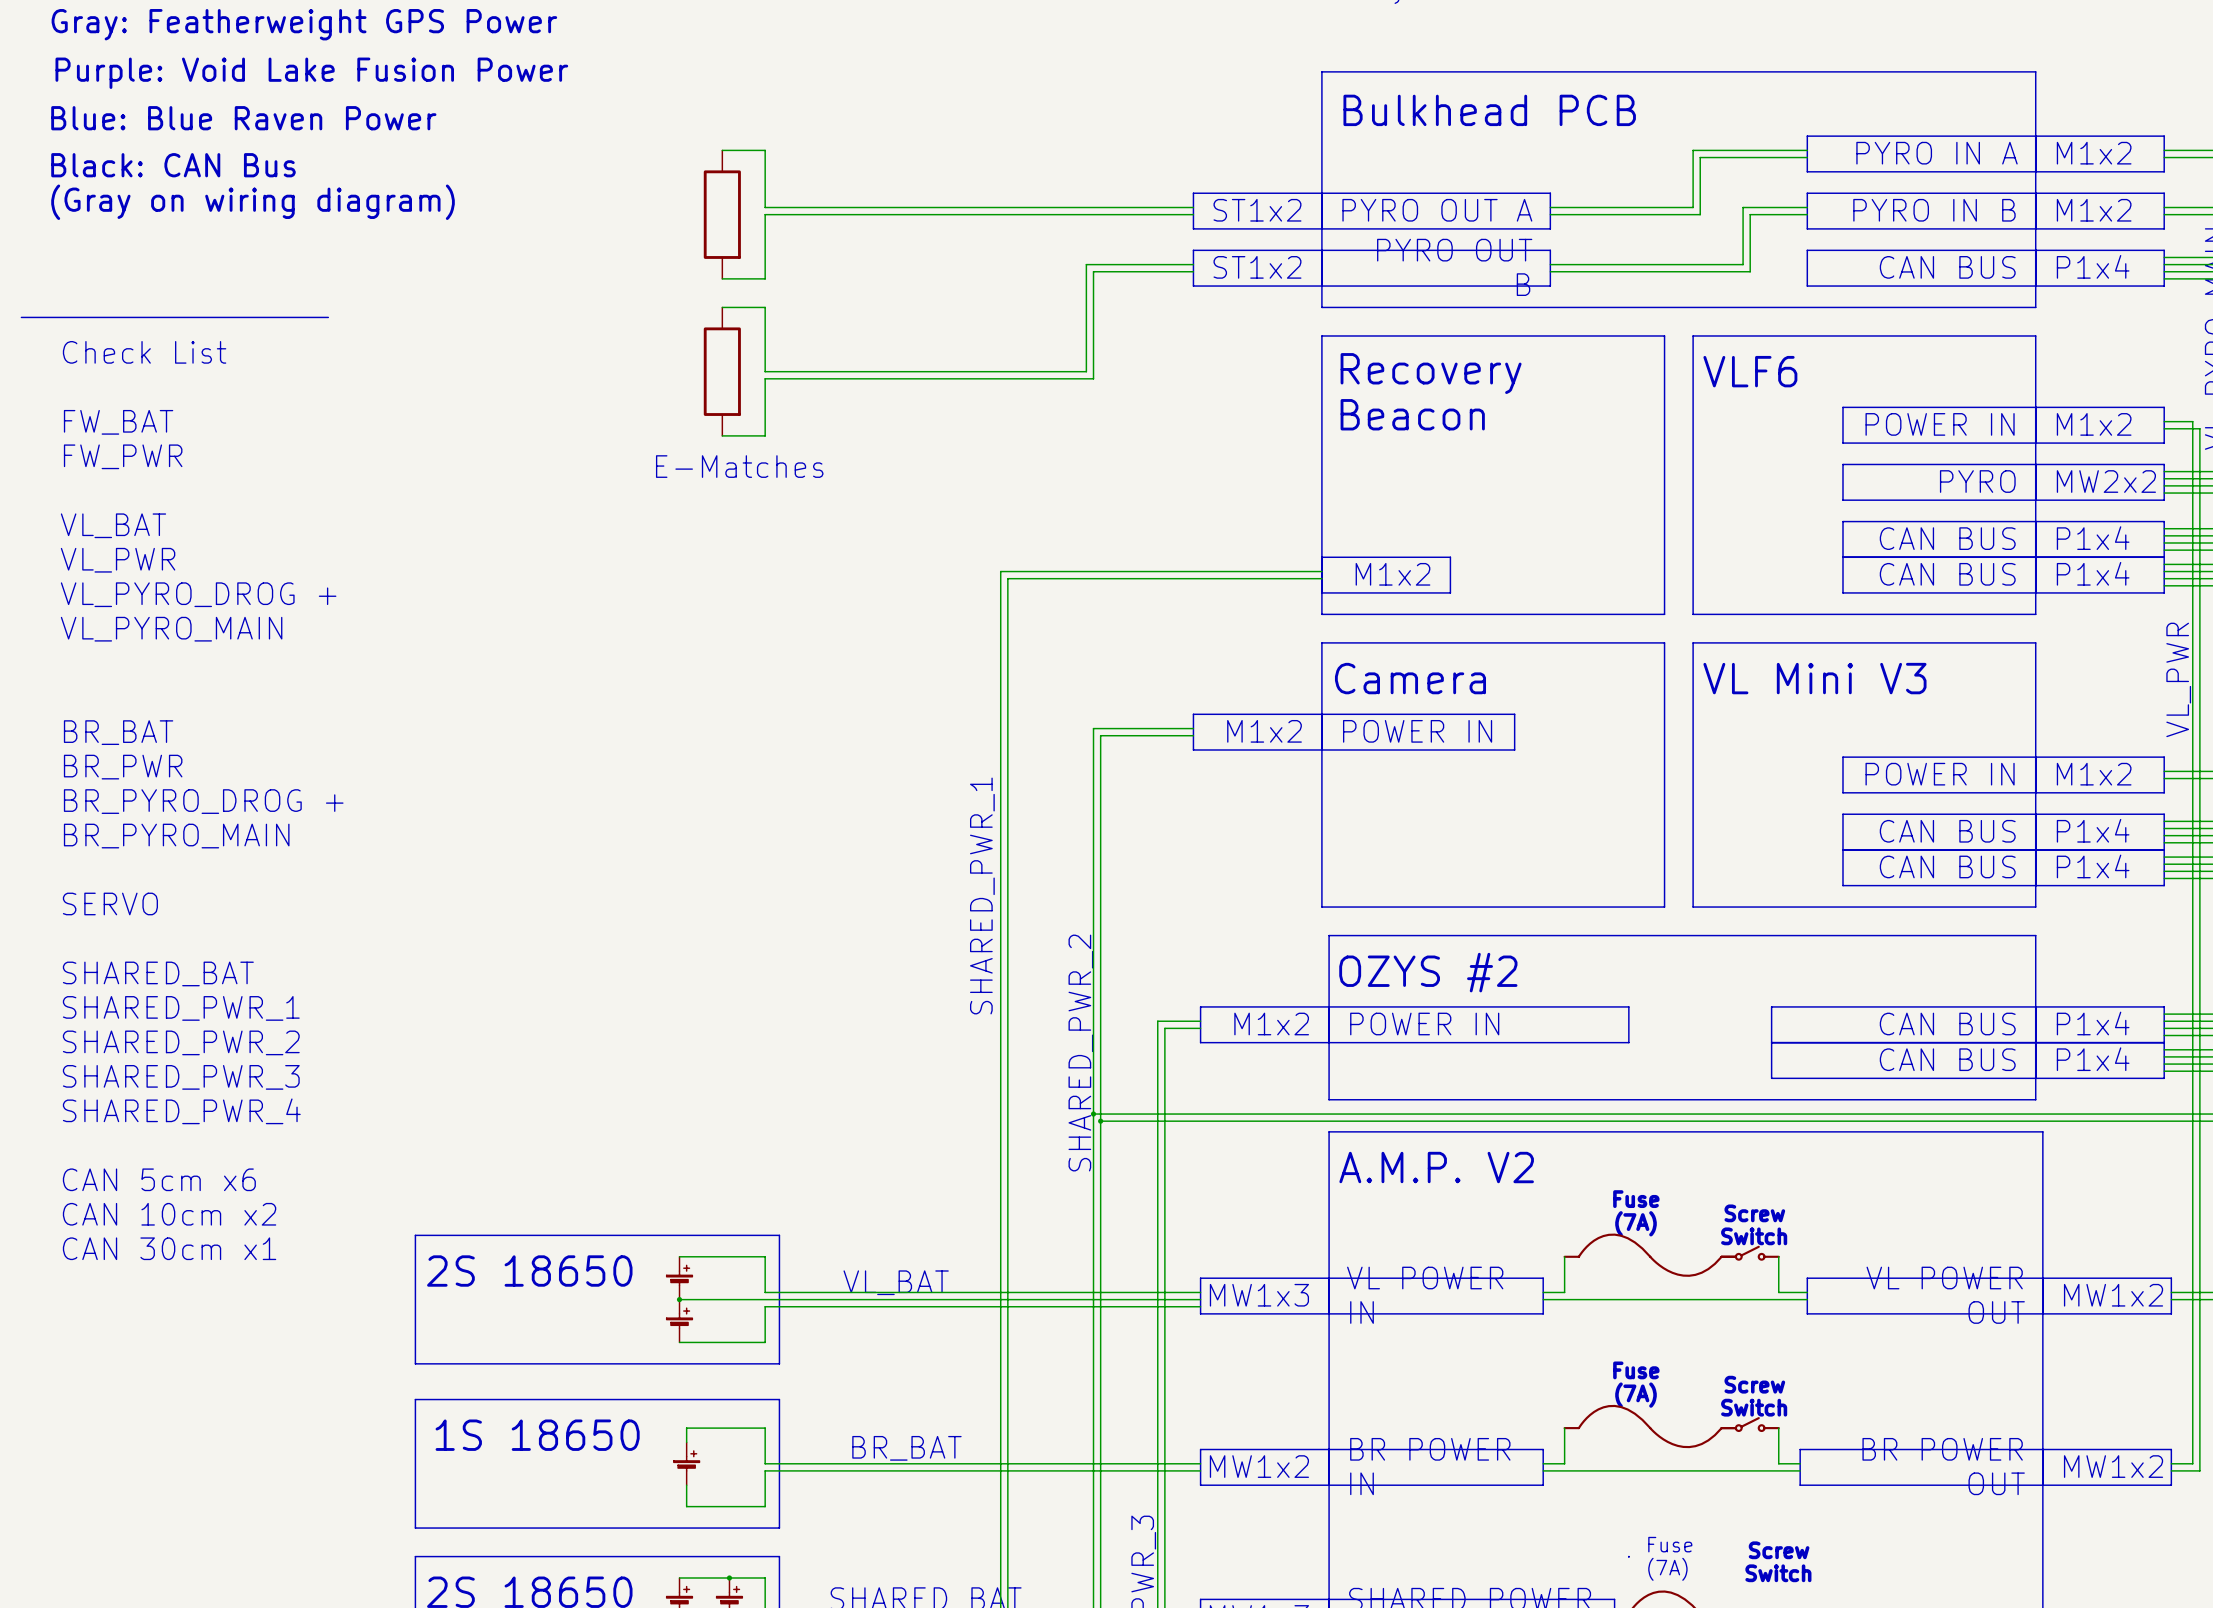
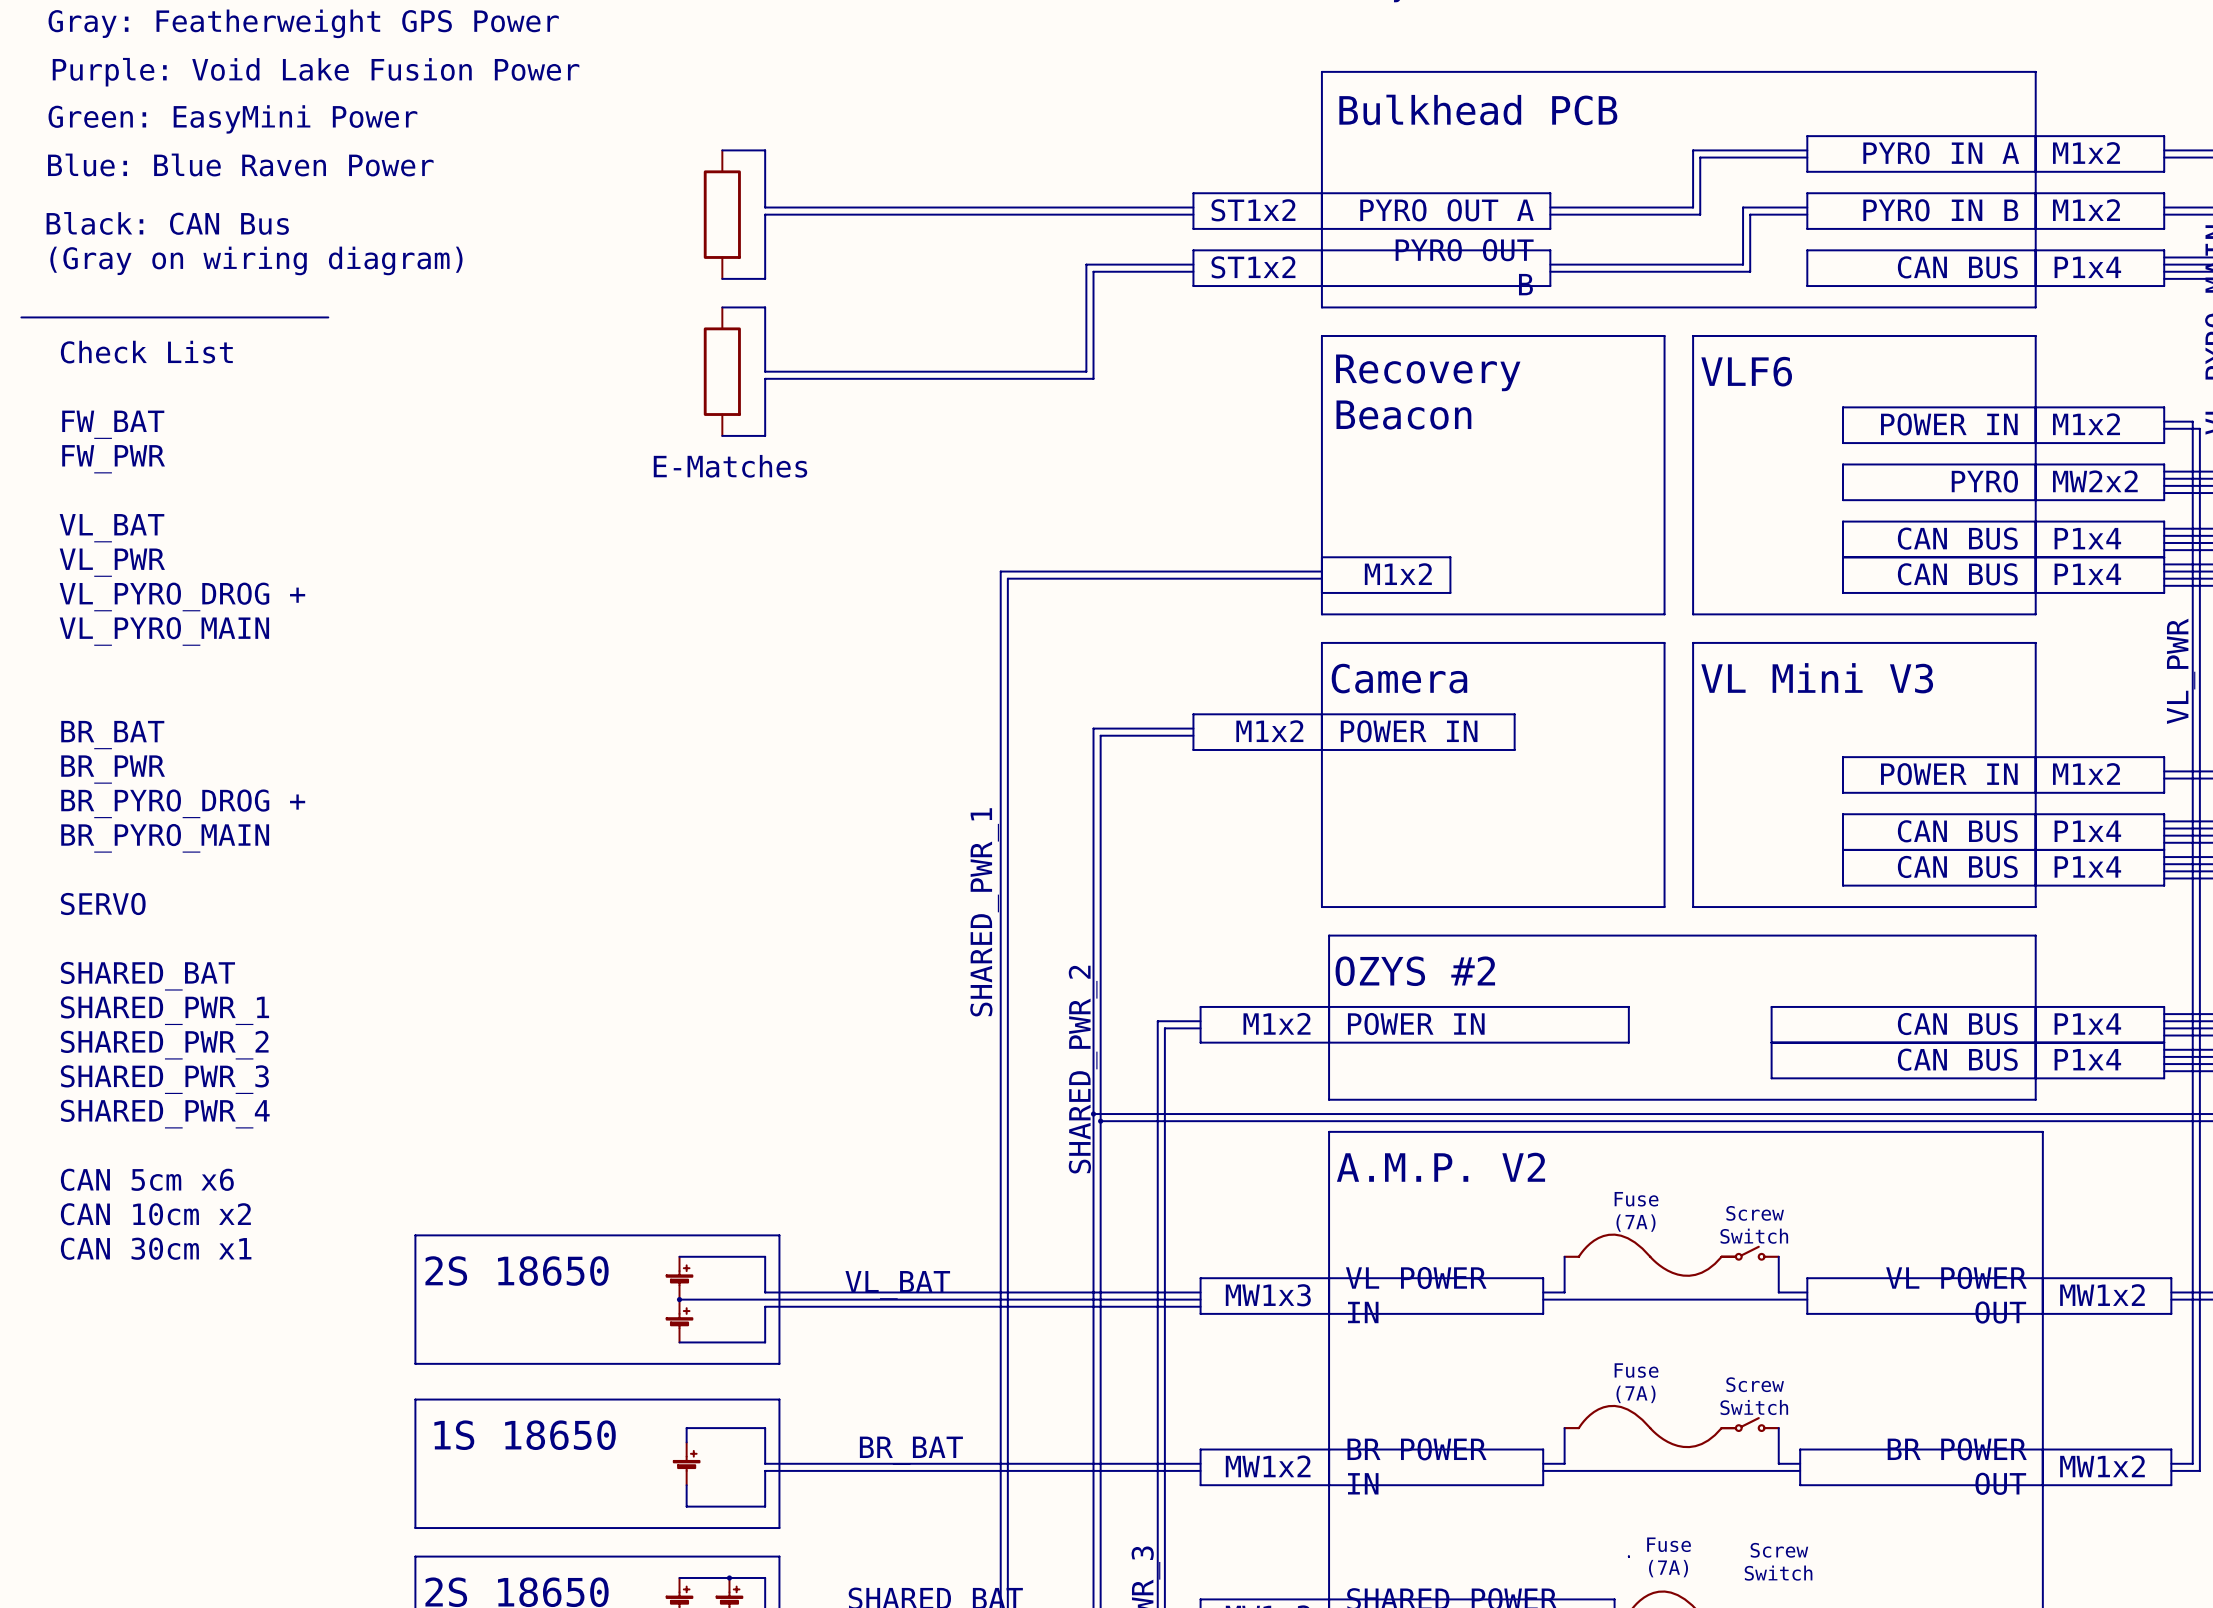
text: Blue: Blue Raven Power (243, 118) -> Green: EasyMini Power (232, 119)
text: Black: CAN Bus (173, 165) -> Blue: Blue Raven Power (240, 165)
text position: (Gray on wiring diagram) (253, 202) -> (Gray on wiring diagram) (256, 260)
text: none -> Black: CAN Bus (167, 223)

